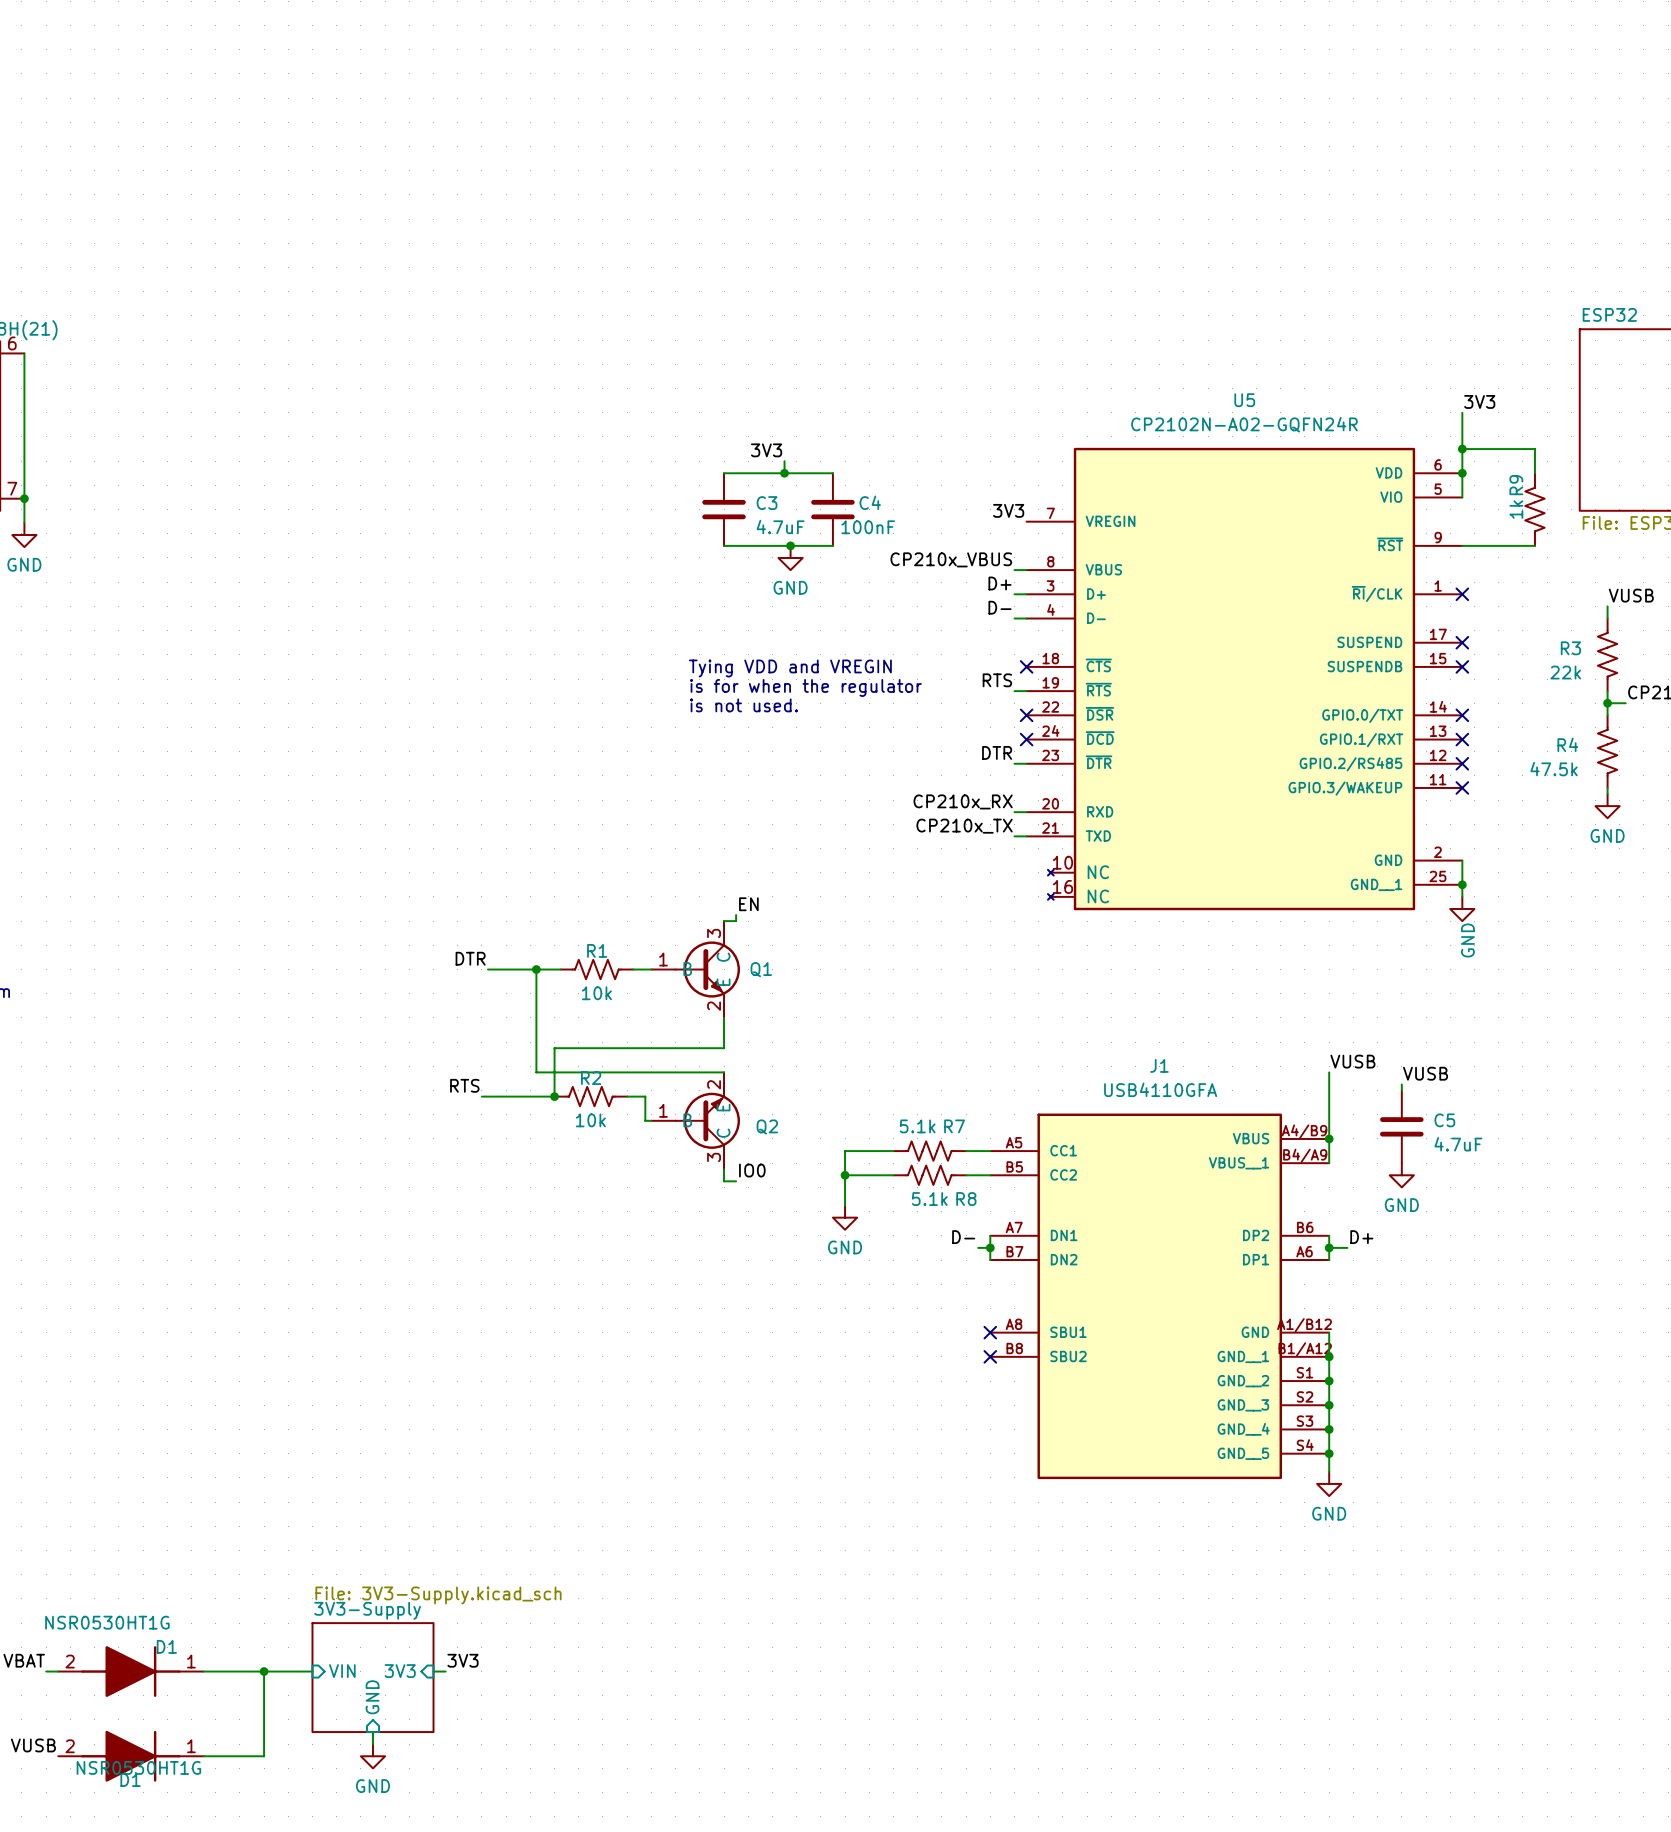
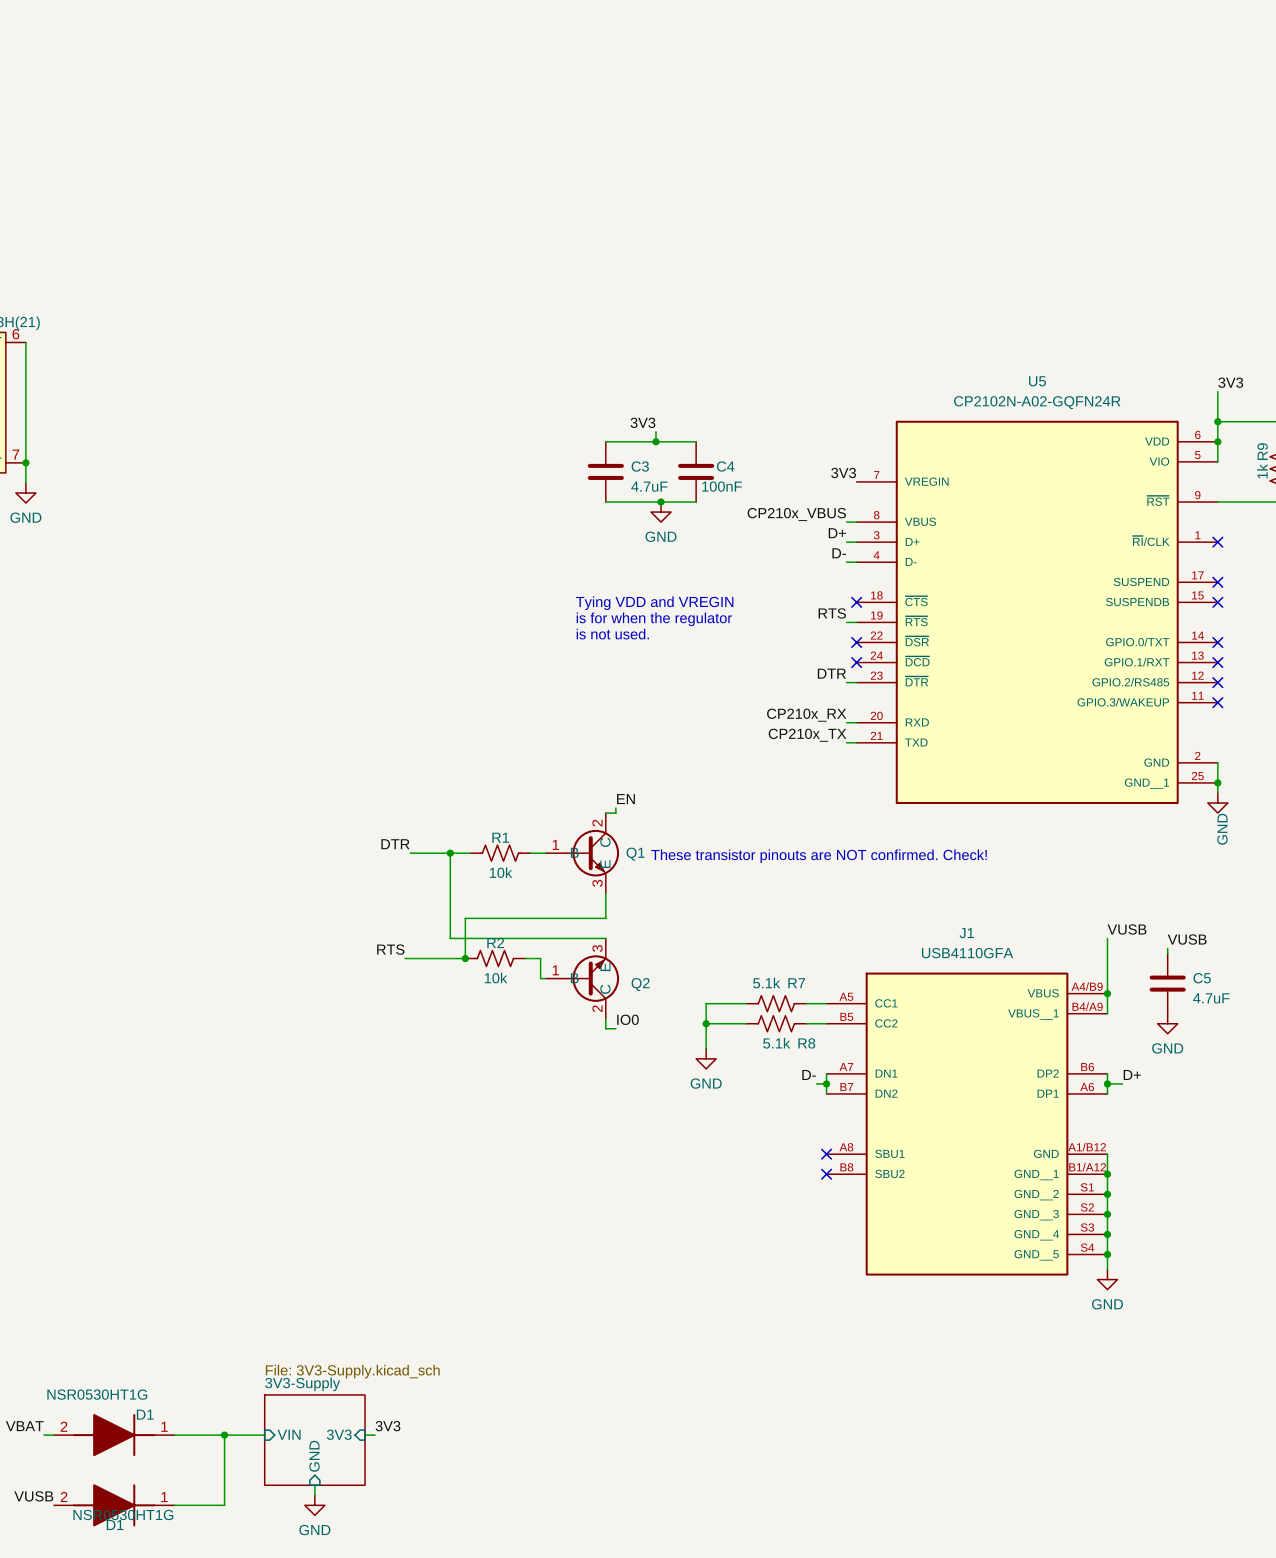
U5 symbol: [1026, 447, 1463, 911] -> [856, 420, 1218, 805]
Q1 pin number: 3 (714, 933) -> 2 (597, 823)
text: none -> These transistor pinouts are NOT confirmed. Check! (819, 856)
Q1 pin number: 2 (714, 1006) -> 3 (597, 883)
Q2 pin number: 2 (714, 1084) -> 3 (597, 948)
Q2 pin number: 3 (714, 1157) -> 2 (597, 1008)

